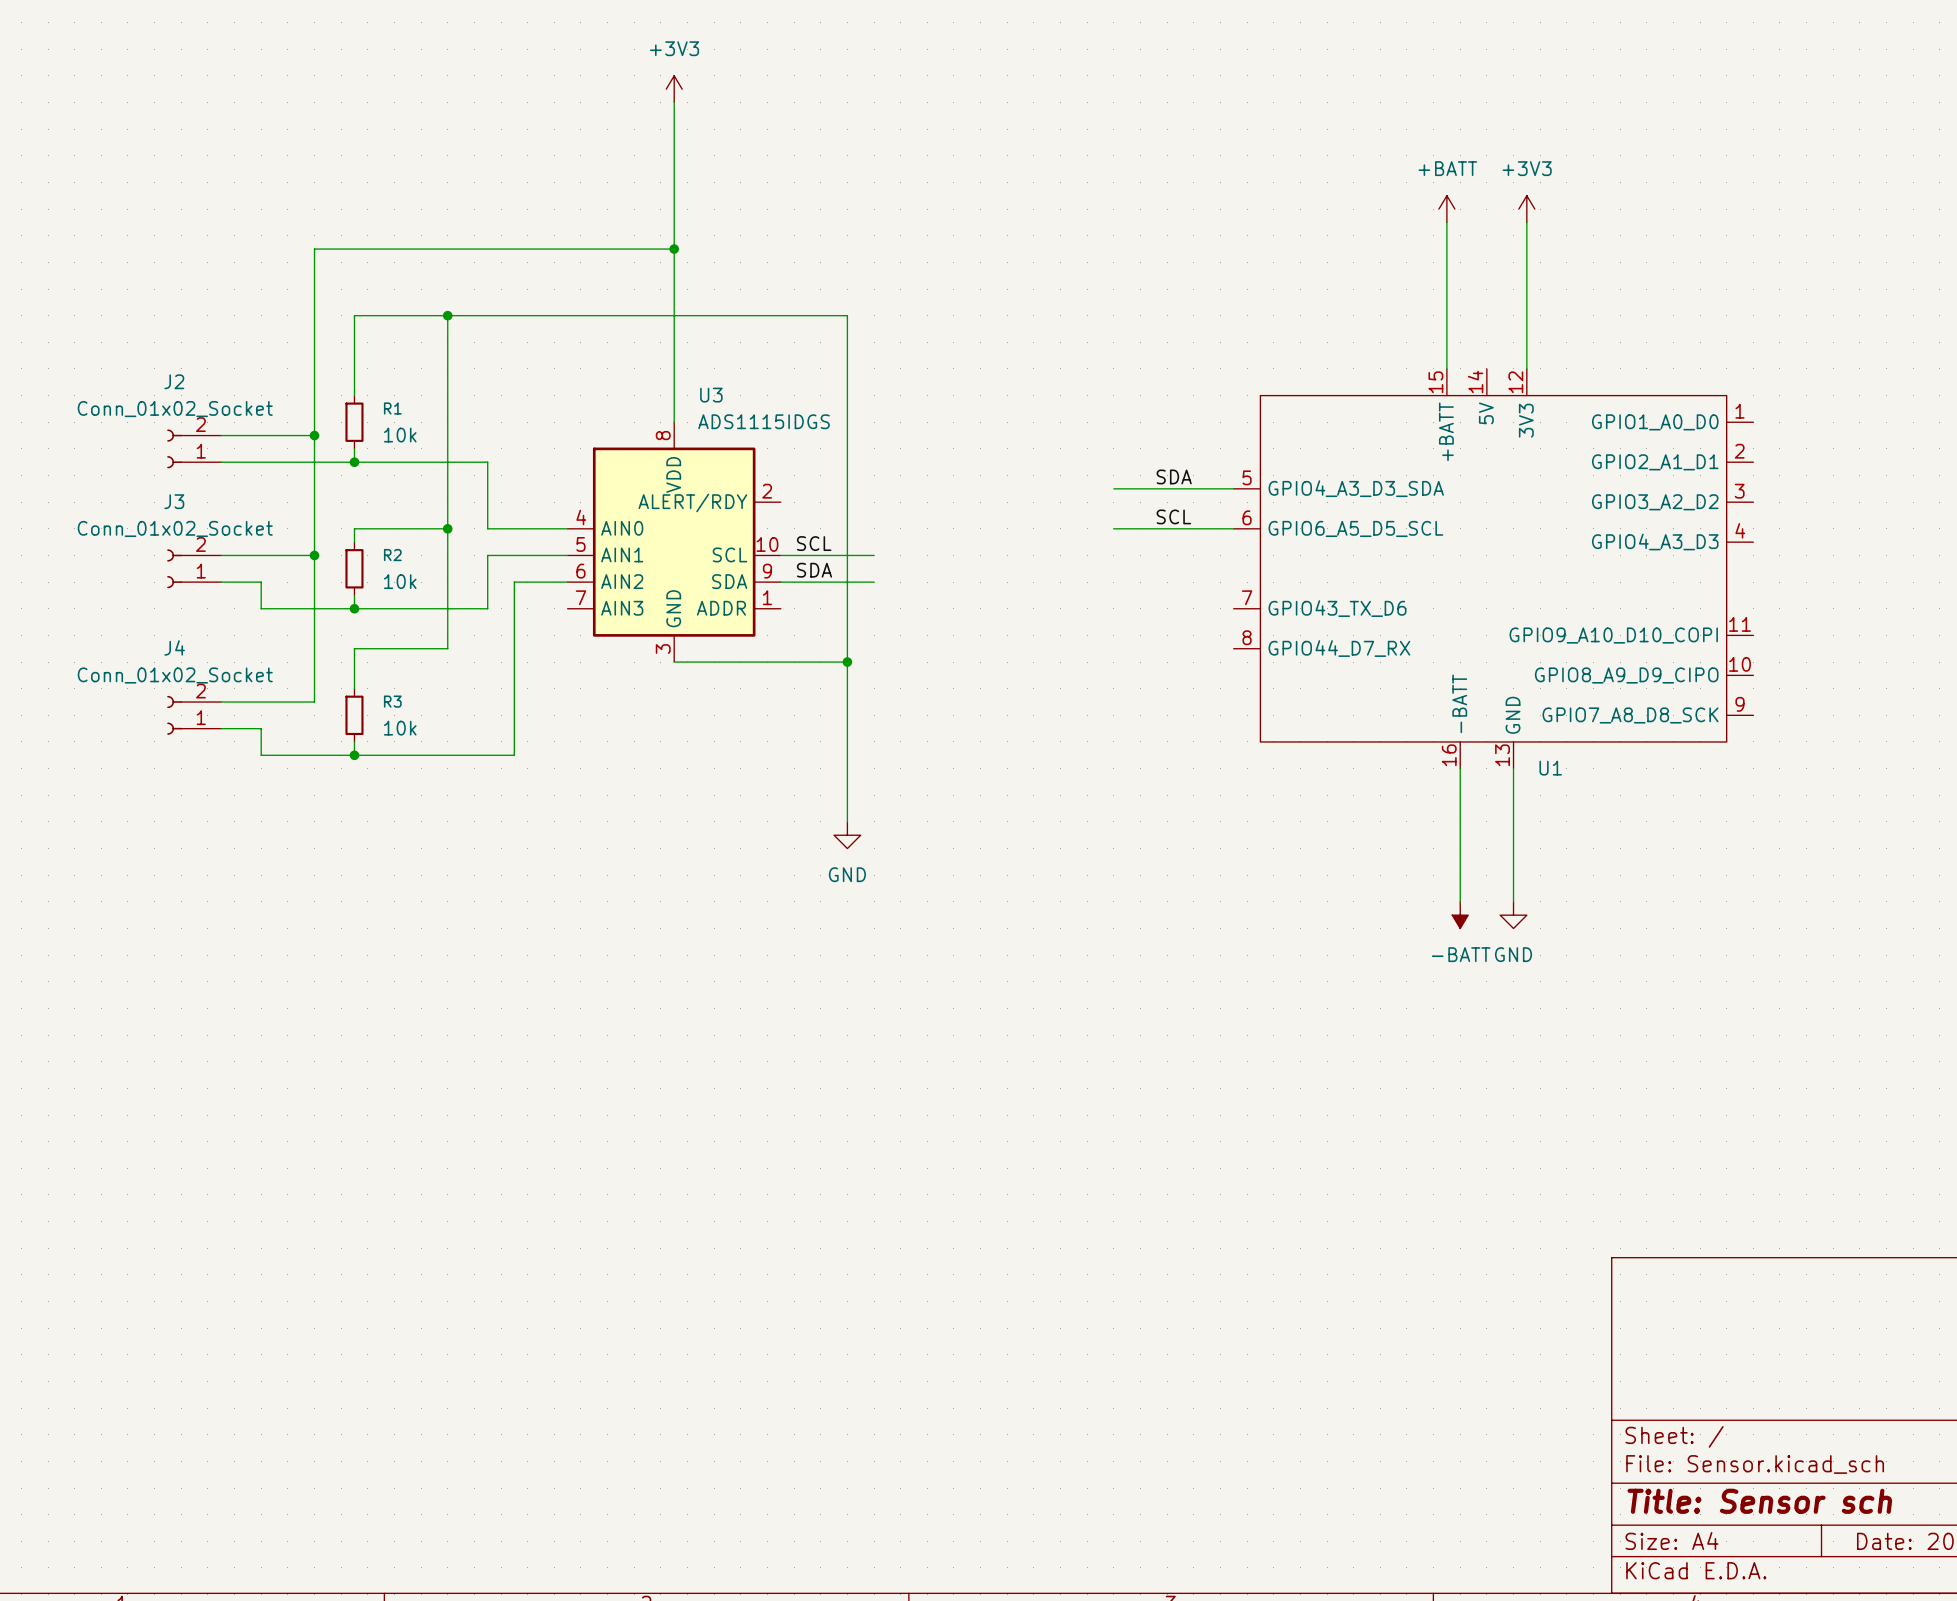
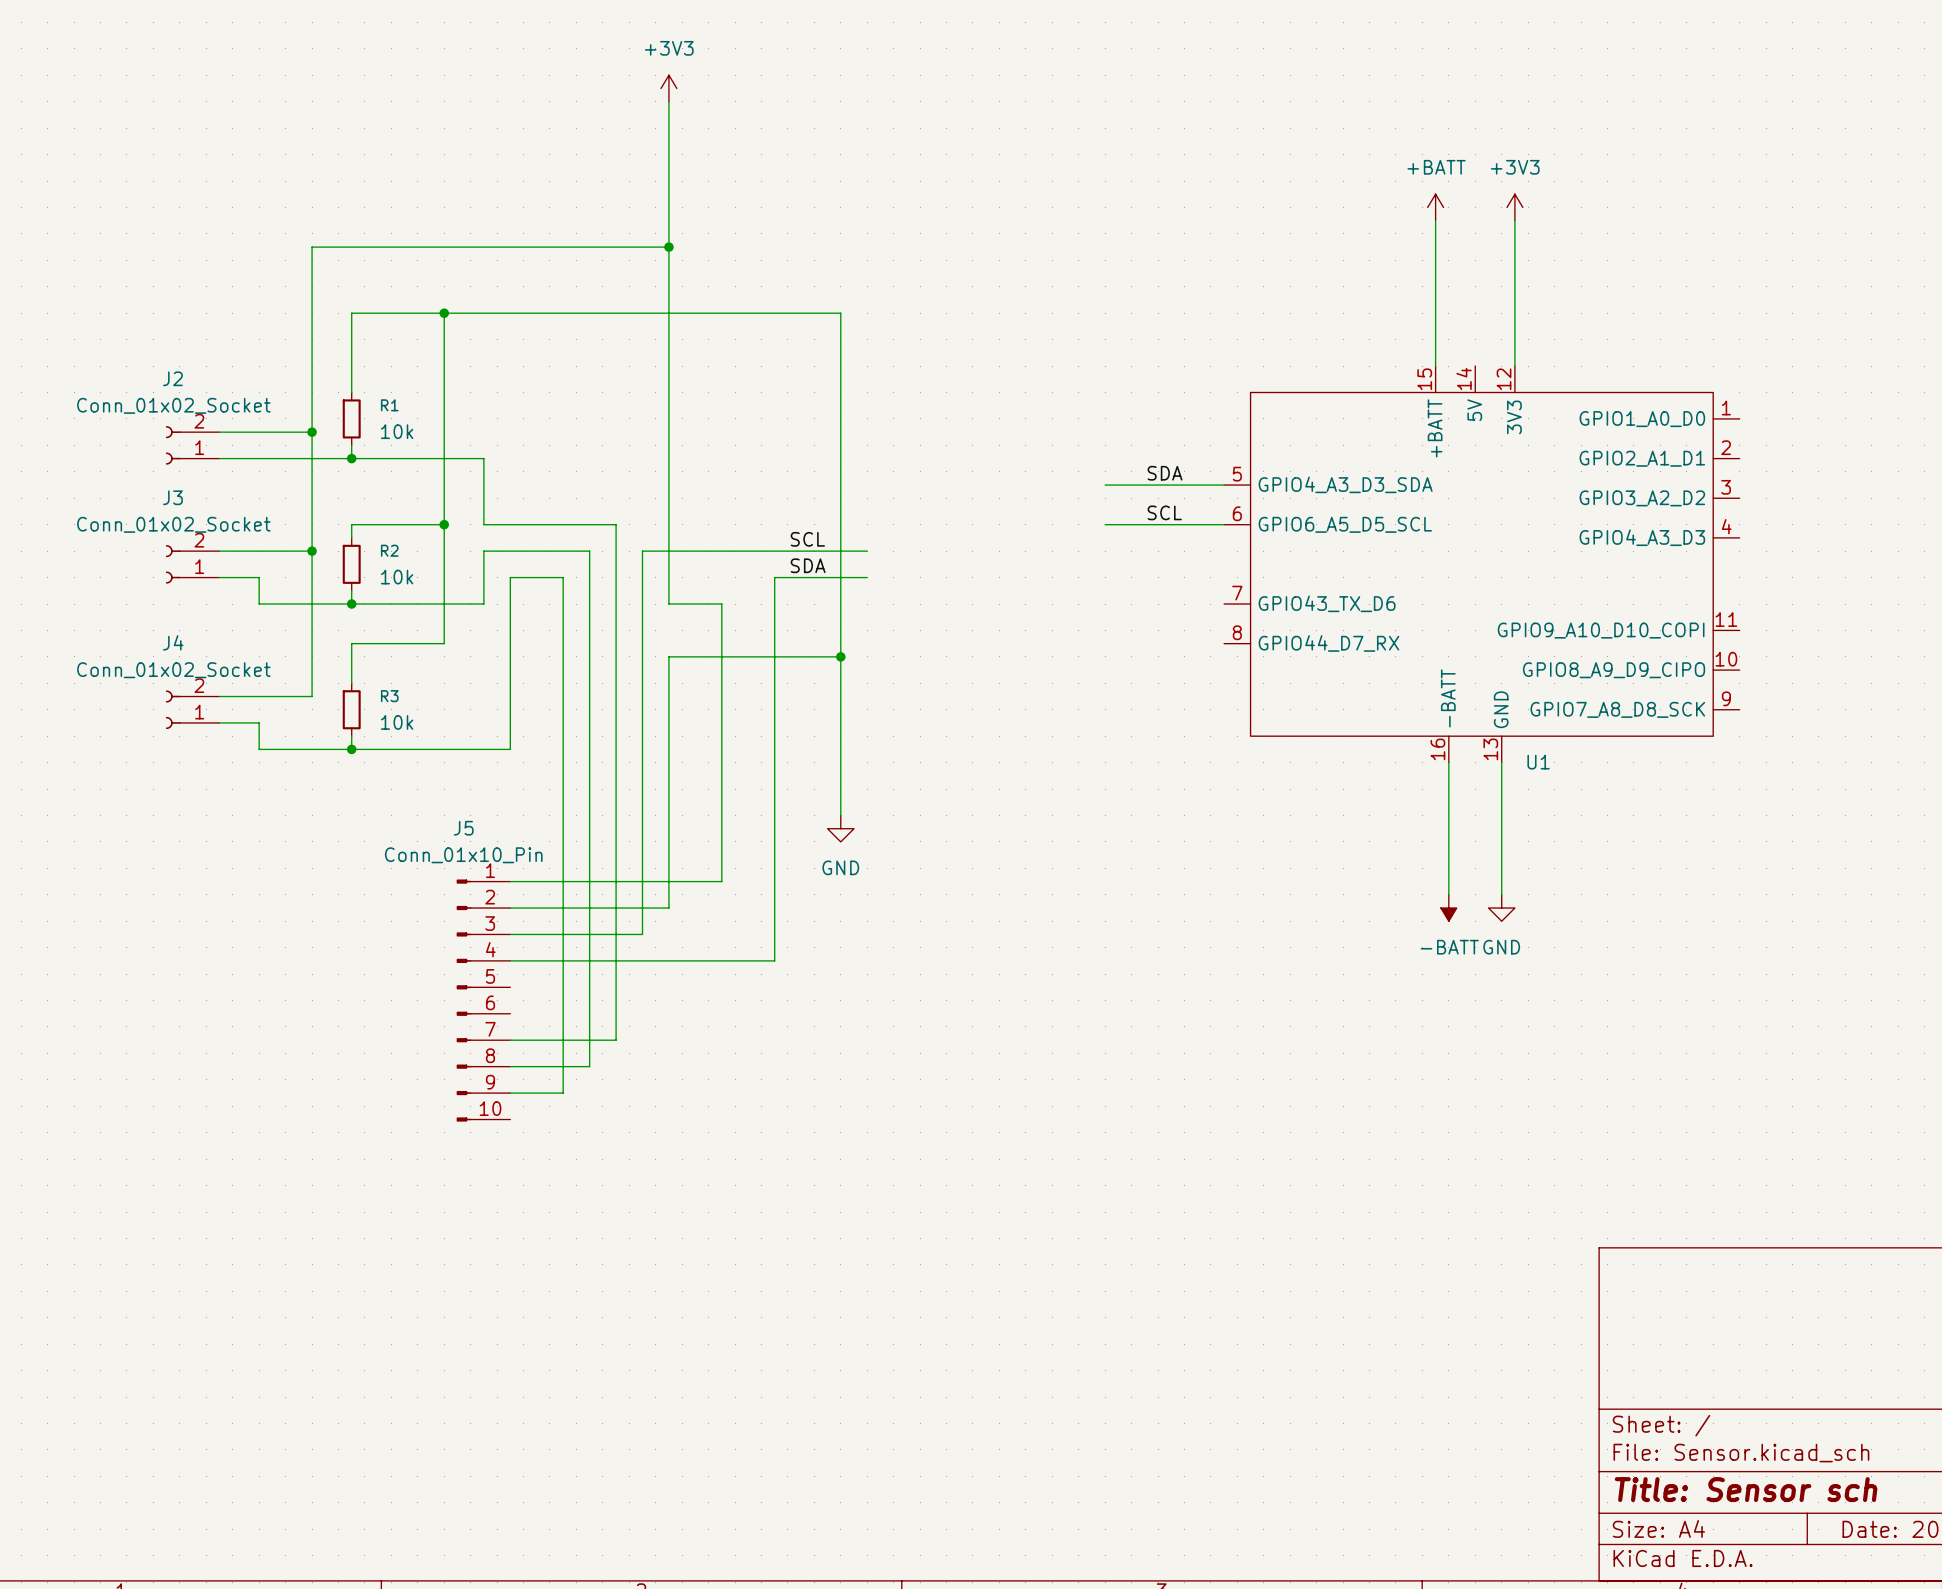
wire: none -> (668, 418) (668, 604) (721, 604) (721, 881) (510, 881)
wire: none -> (563, 524) (616, 524) (616, 1040) (510, 1040)
U3: ADS1115IDGS (674, 542) -> none
wire: none -> (563, 551) (589, 551) (589, 1066) (510, 1066)
wire: none -> (774, 551) (642, 551) (642, 934) (510, 934)
wire: none -> (563, 577) (563, 1093) (510, 1093)
wire: none -> (774, 577) (774, 960) (510, 960)
wire: none -> (668, 656) (668, 908) (510, 908)
J5: none -> Conn_01x10_Pin (483, 1000)

